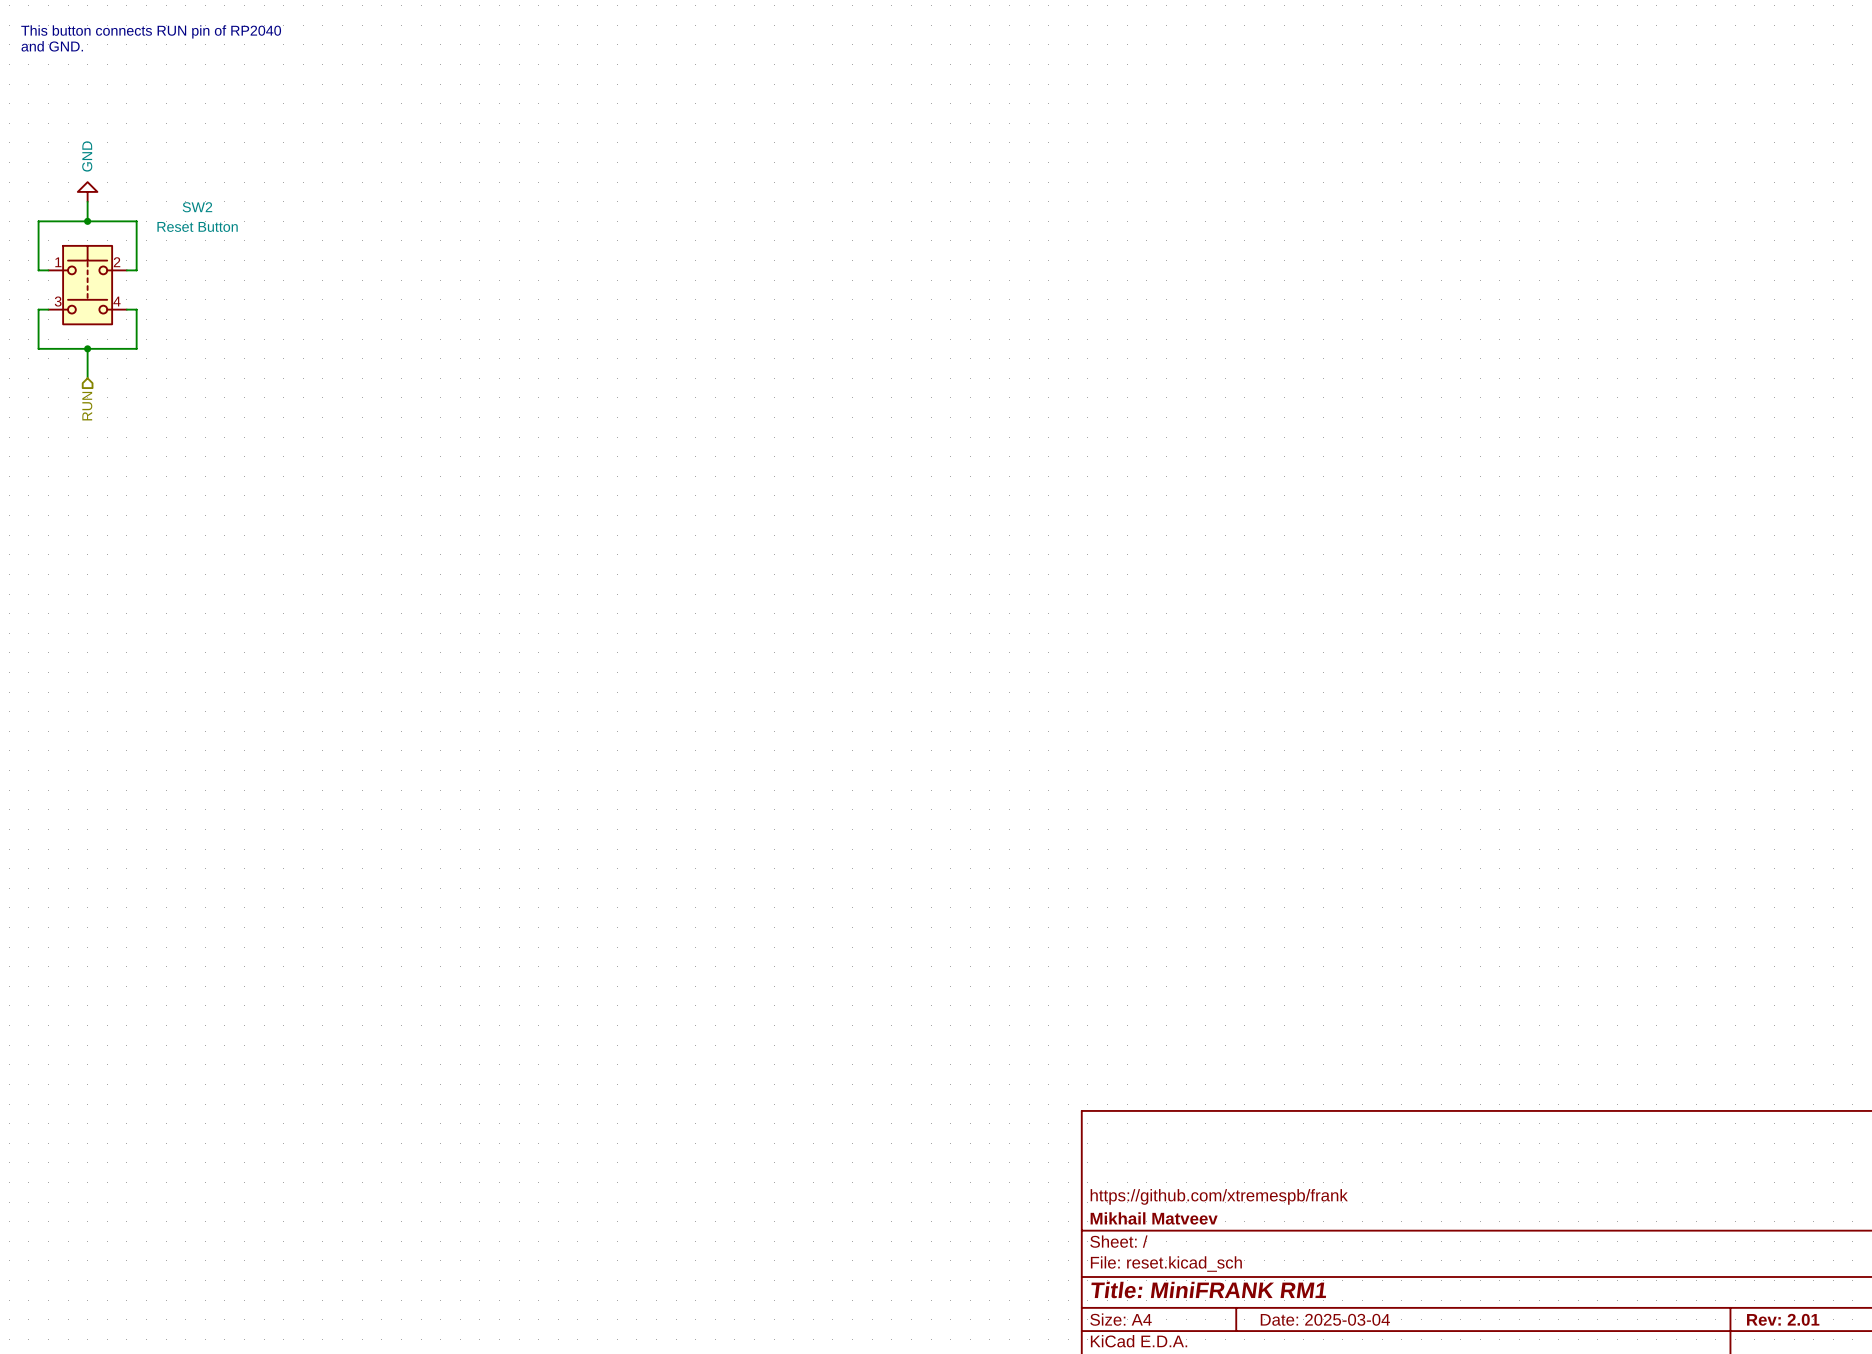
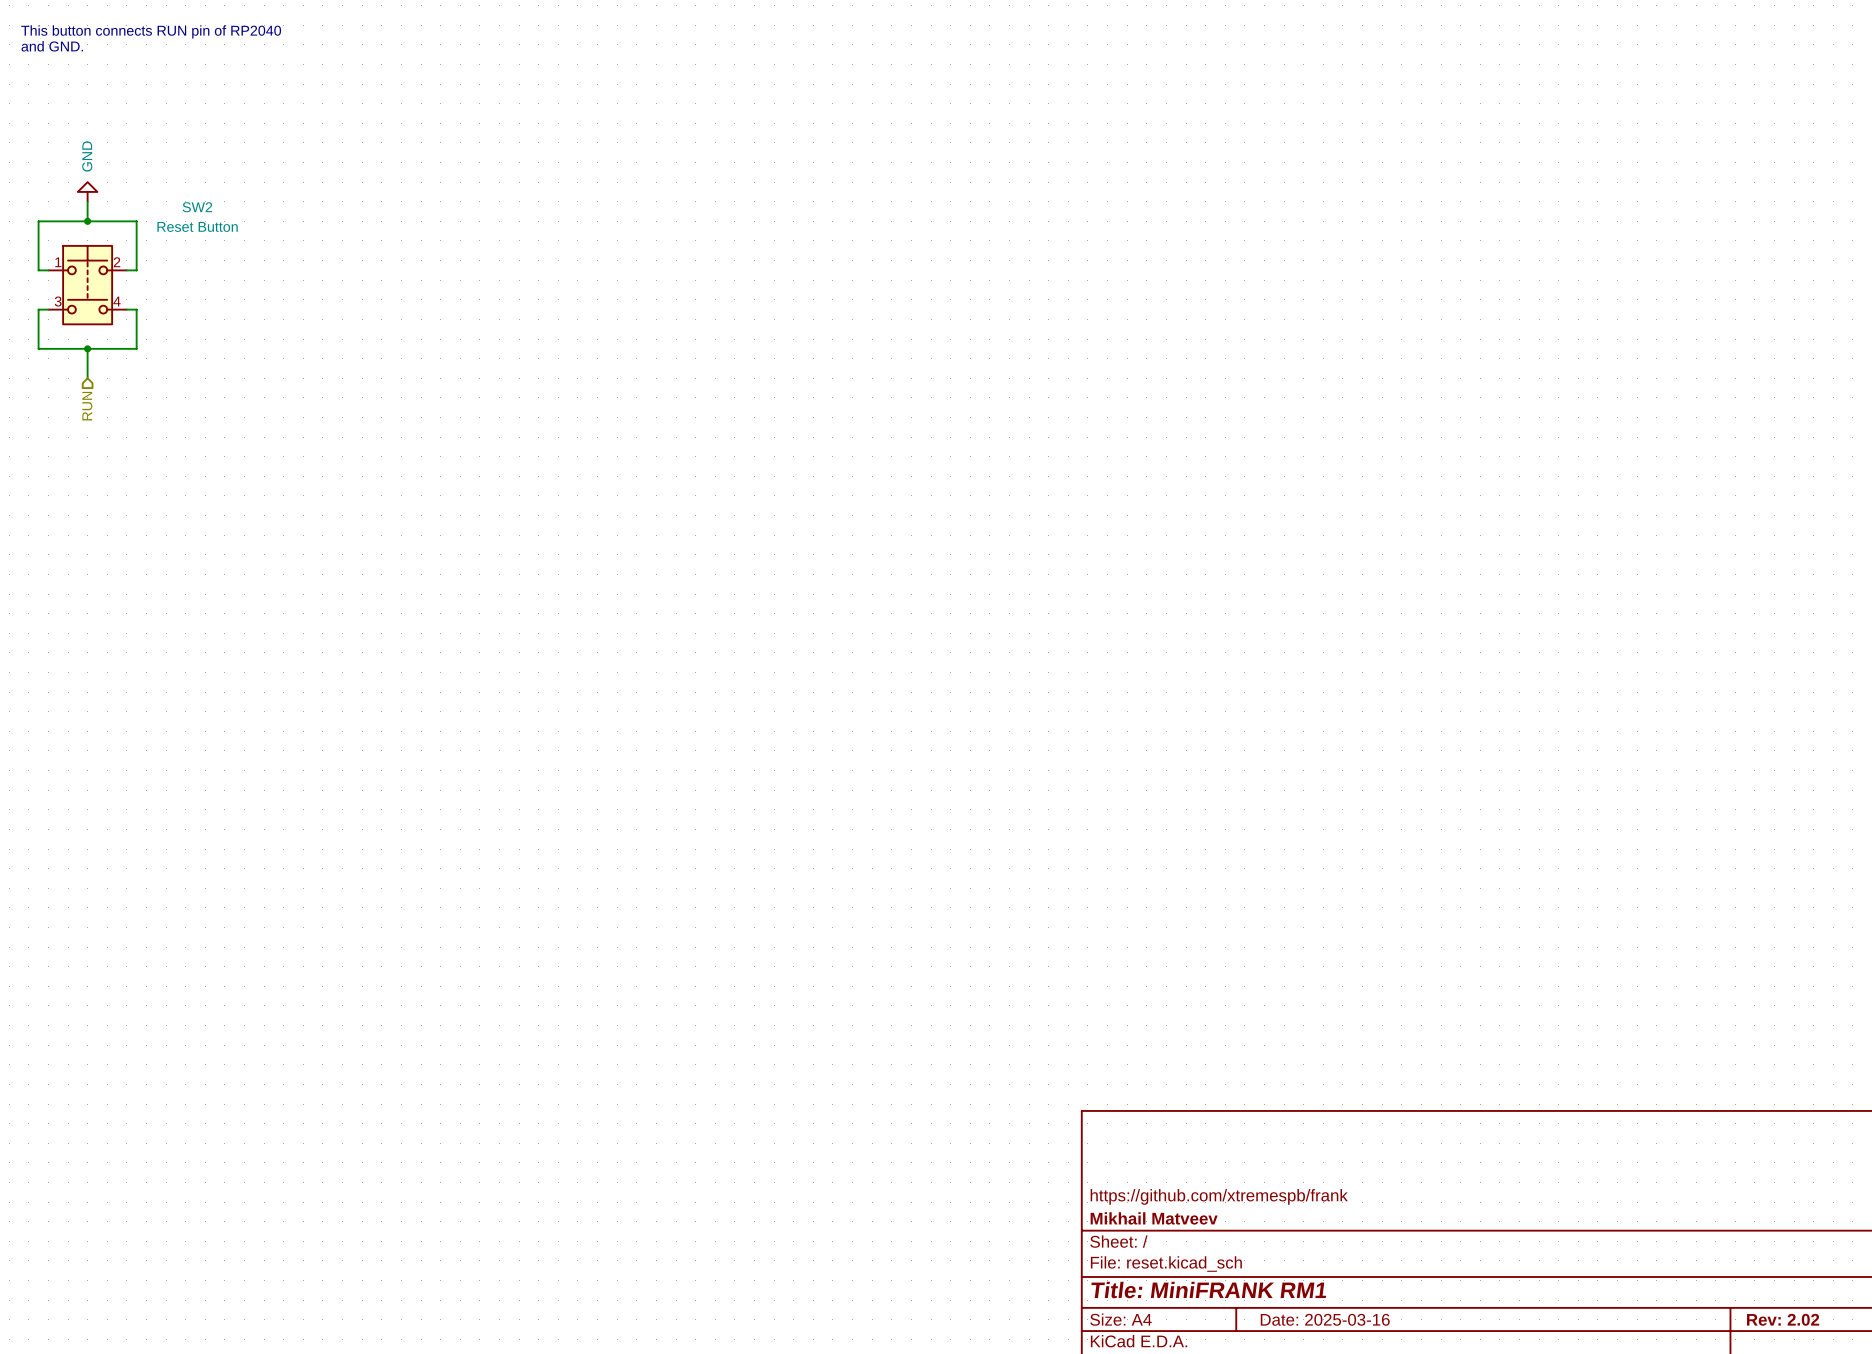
title block: Date: 2025-03-04 (1325, 1319) -> Date: 2025-03-16 (1325, 1319)
title block: Rev: 2.01 (1783, 1319) -> Rev: 2.02 (1783, 1319)

